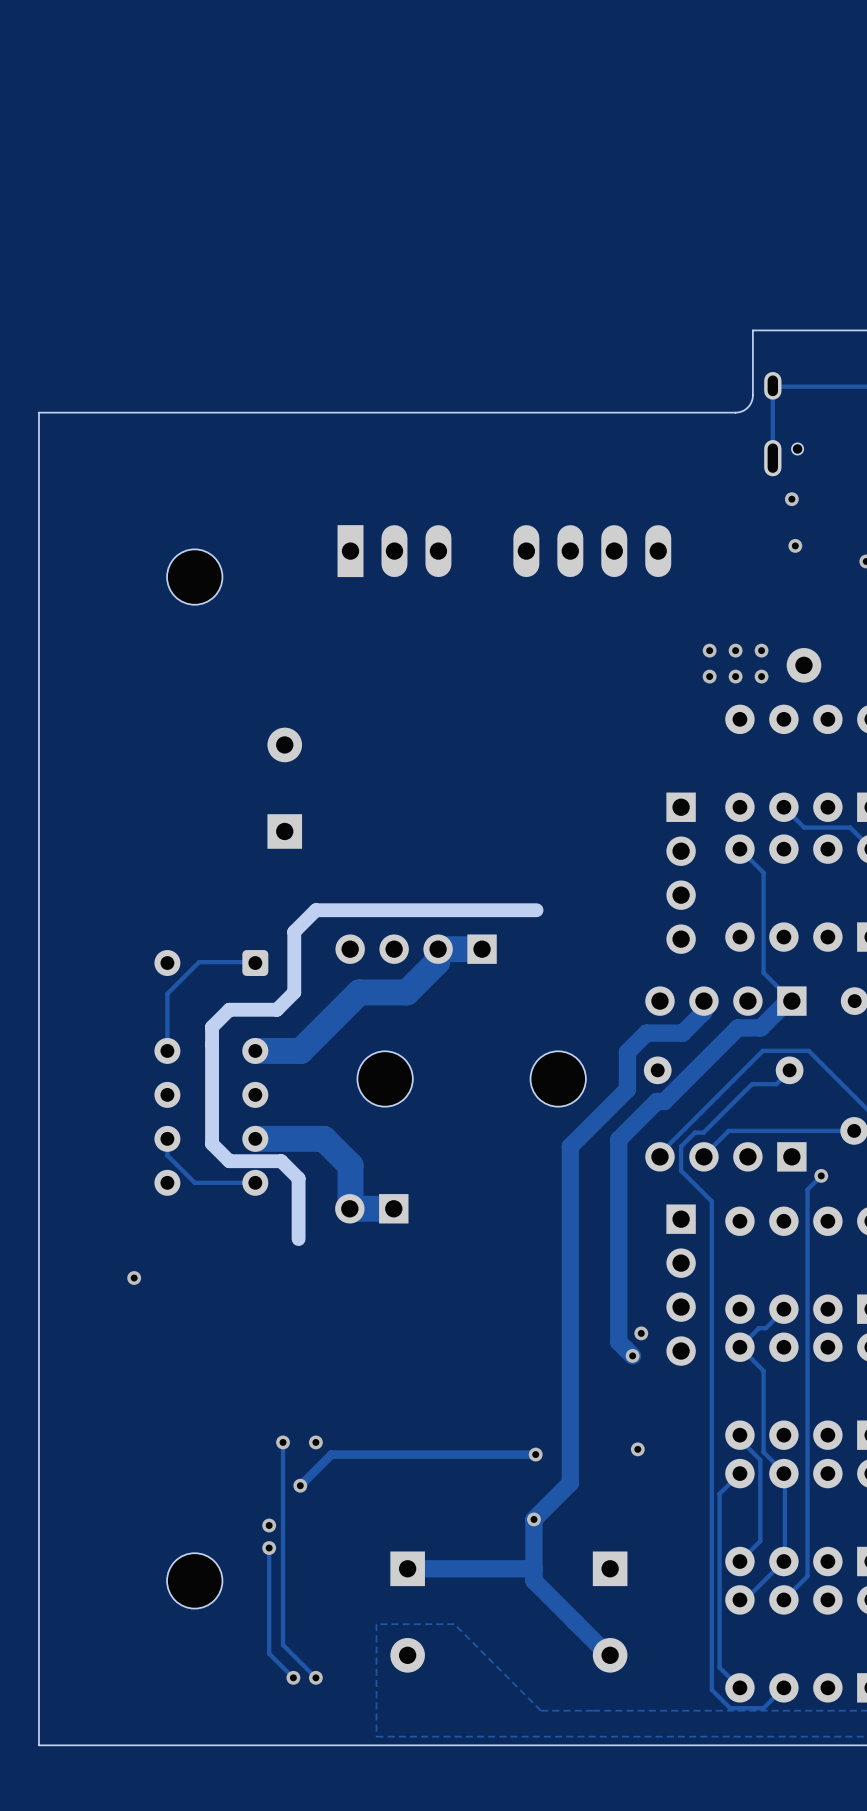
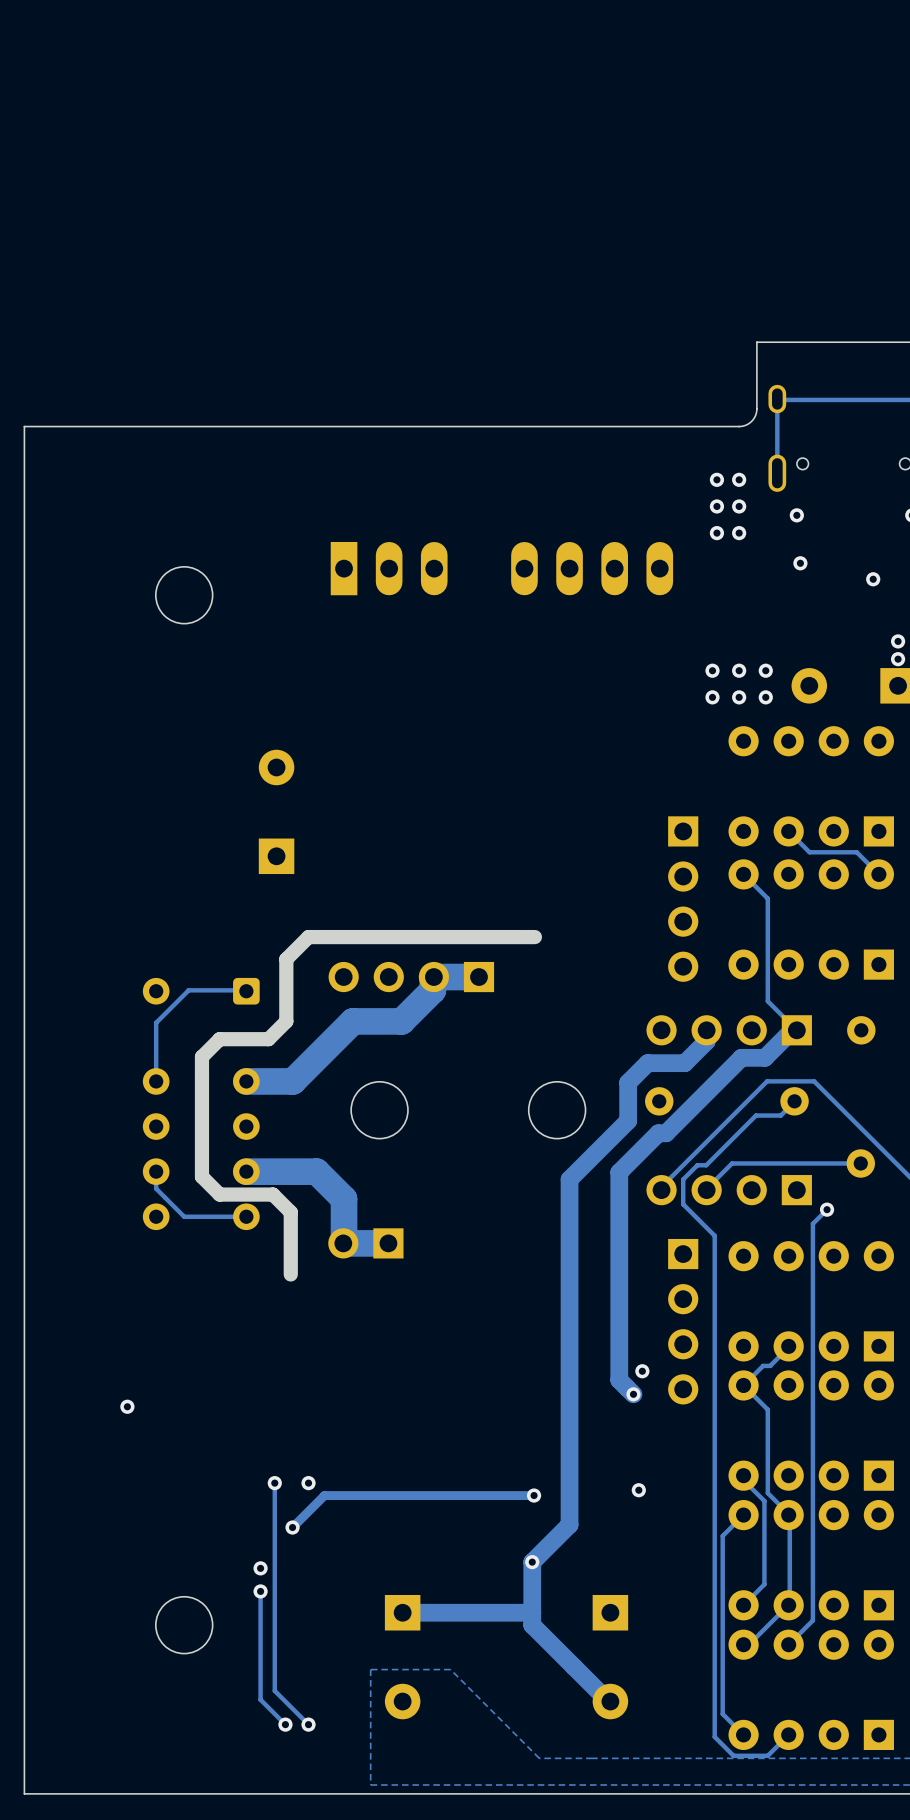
via: none -> (716, 479)
via: none -> (739, 479)
via: none -> (716, 506)
via: none -> (739, 506)
via: none -> (716, 533)
via: none -> (739, 533)
via position: (134, 1278) -> (127, 1406)

